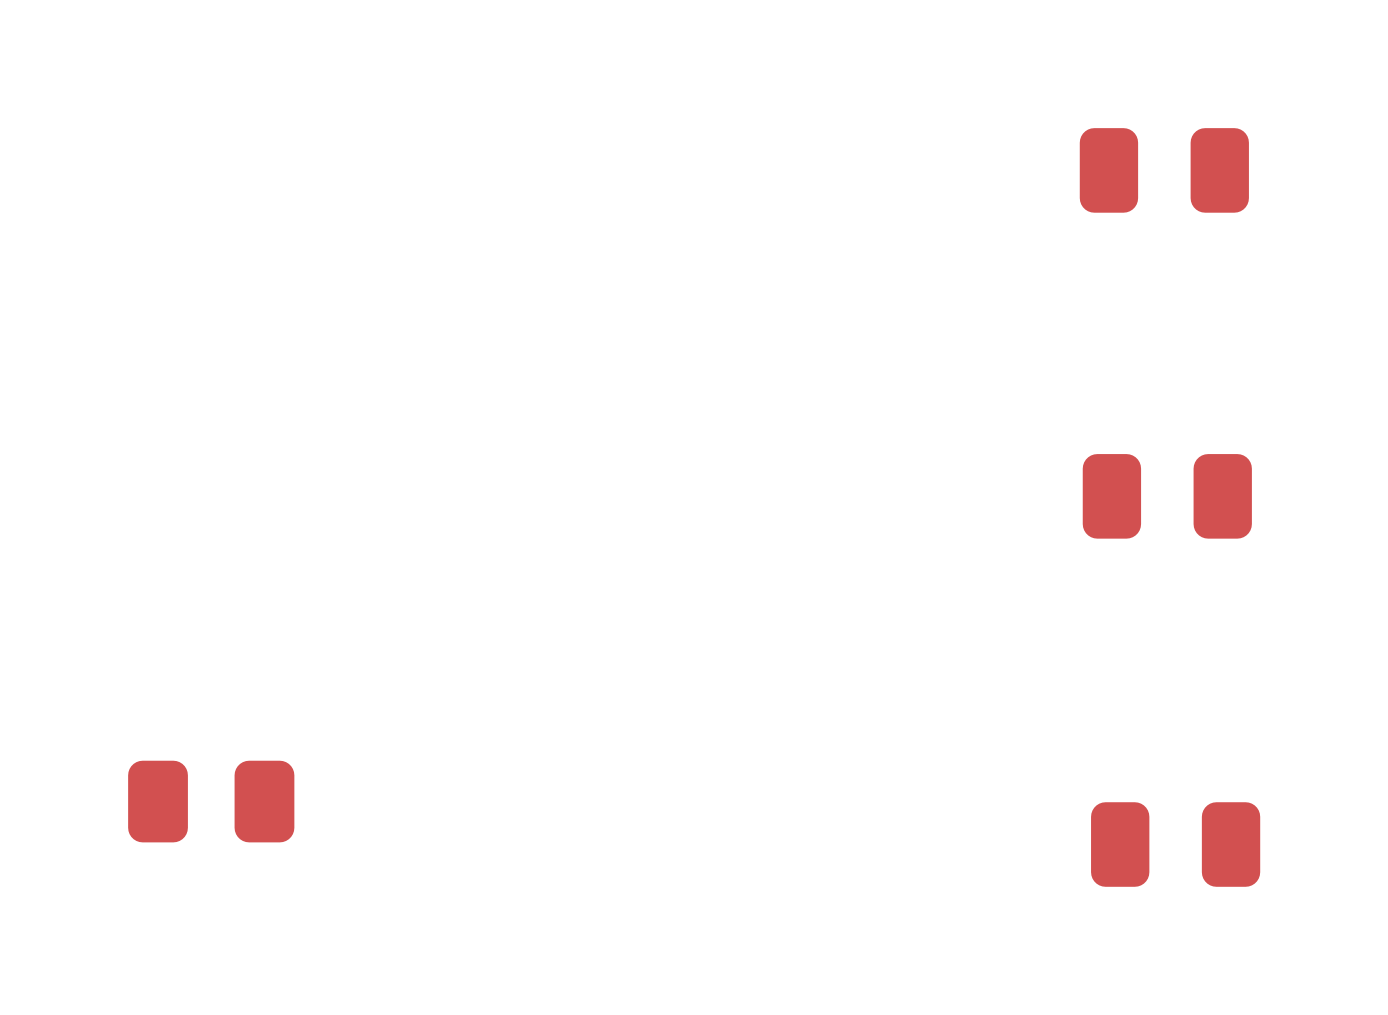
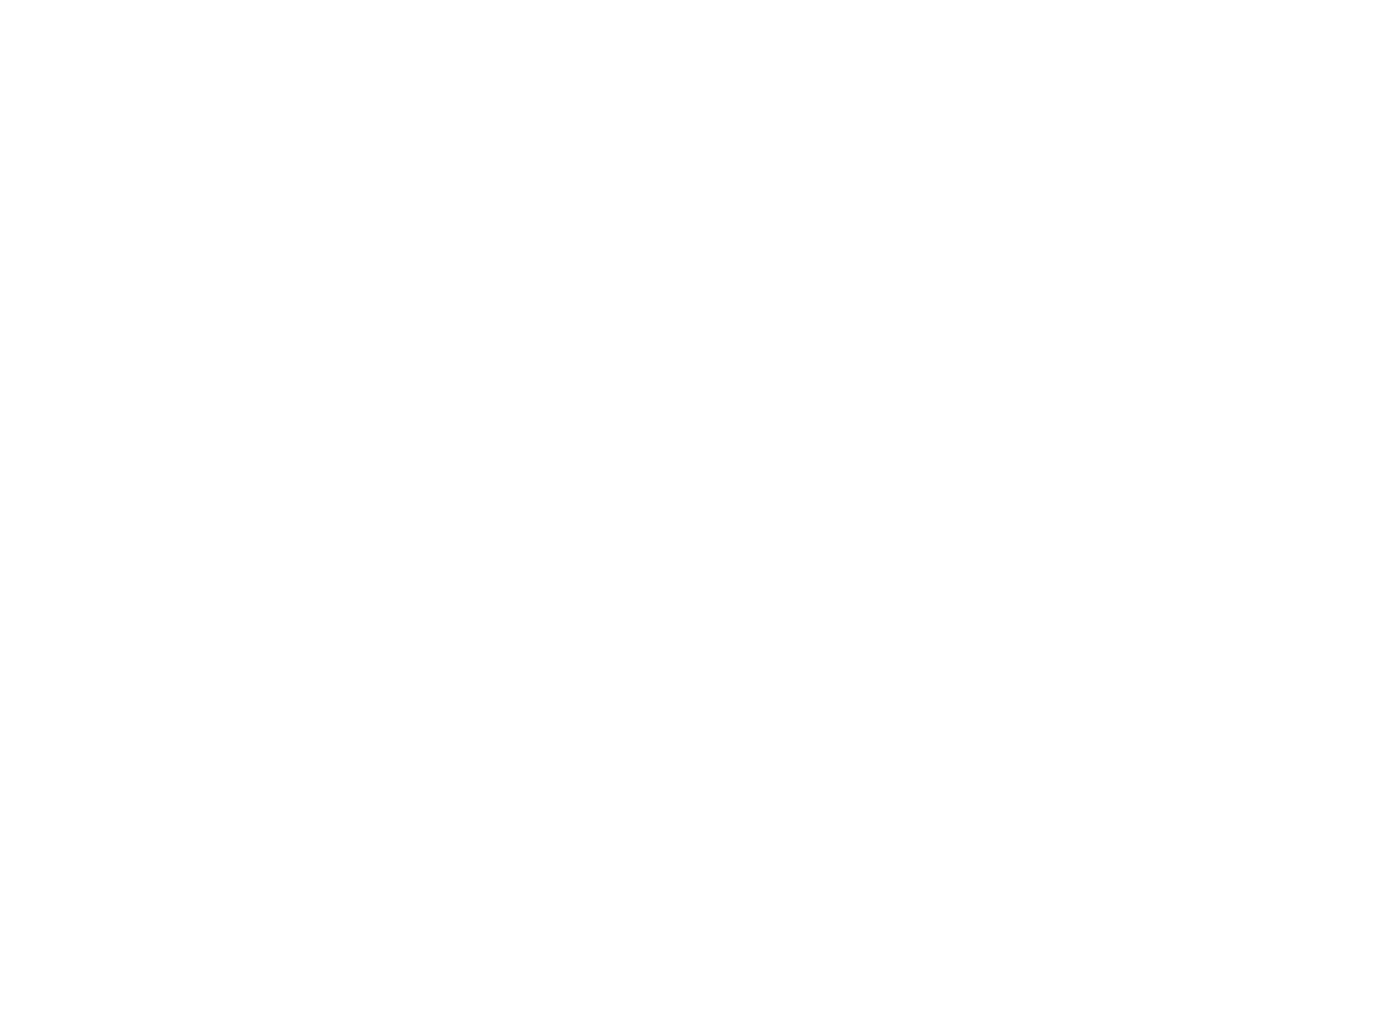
part: (1164, 170) -> none
part: (1167, 496) -> none
part: (211, 801) -> none
part: (1175, 844) -> none

